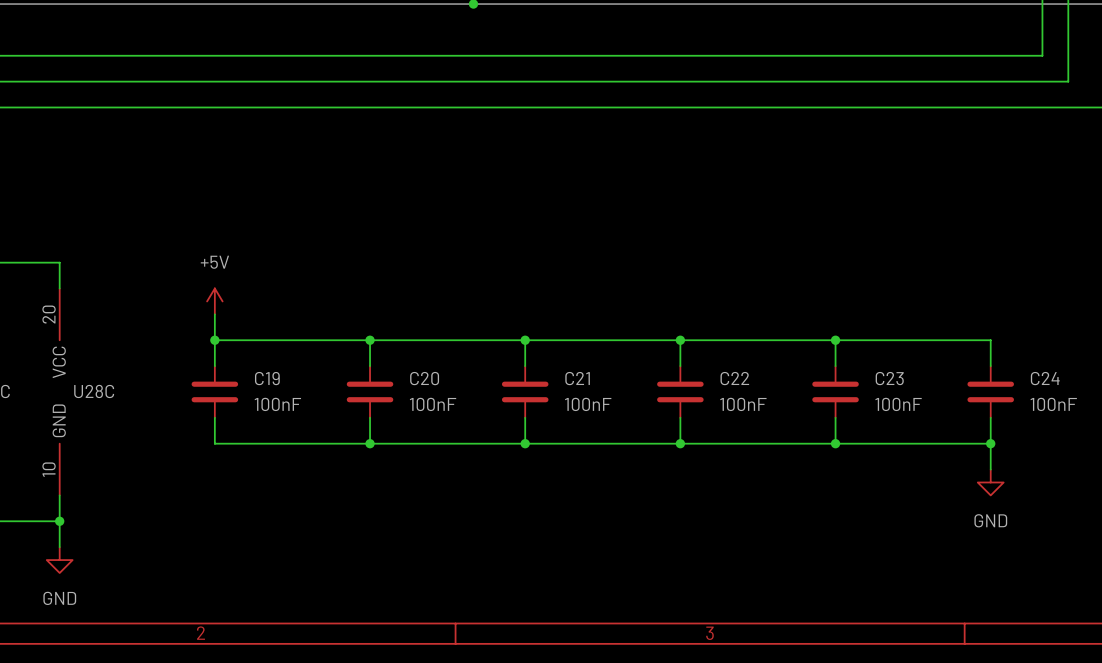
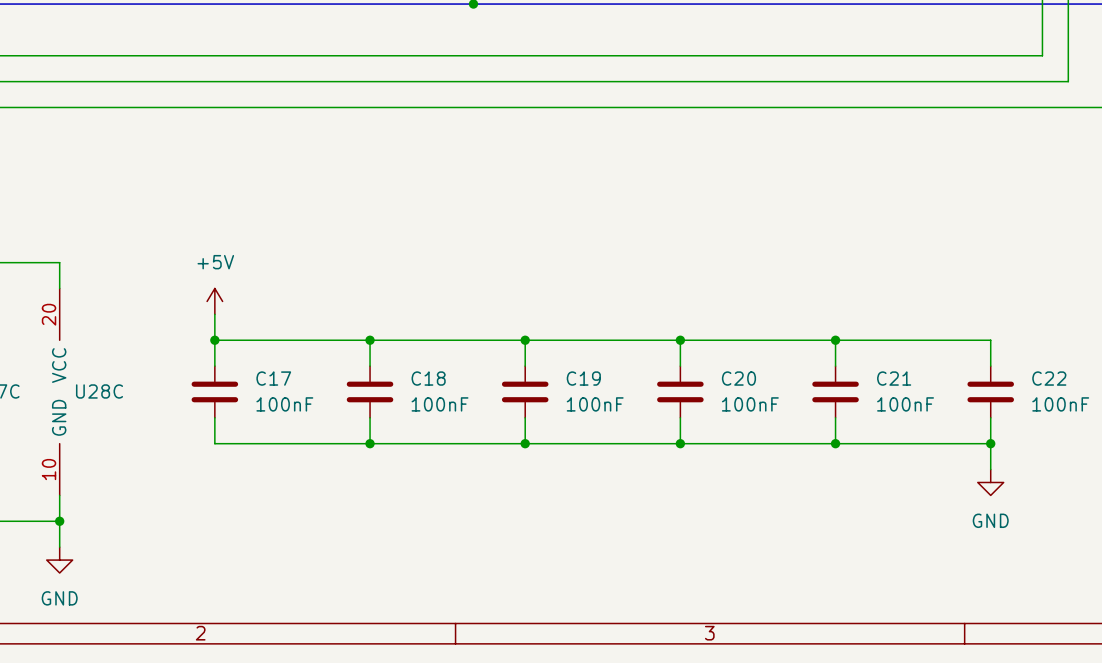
C19 name: C19 (267, 378) -> C17 (273, 378)
C20 name: C20 (424, 378) -> C18 (428, 378)
C21 name: C21 (577, 378) -> C19 (583, 378)
C22 name: C22 (734, 378) -> C20 (738, 378)
C23 name: C23 (889, 378) -> C21 (894, 378)
C24 name: C24 (1045, 378) -> C22 (1049, 378)

